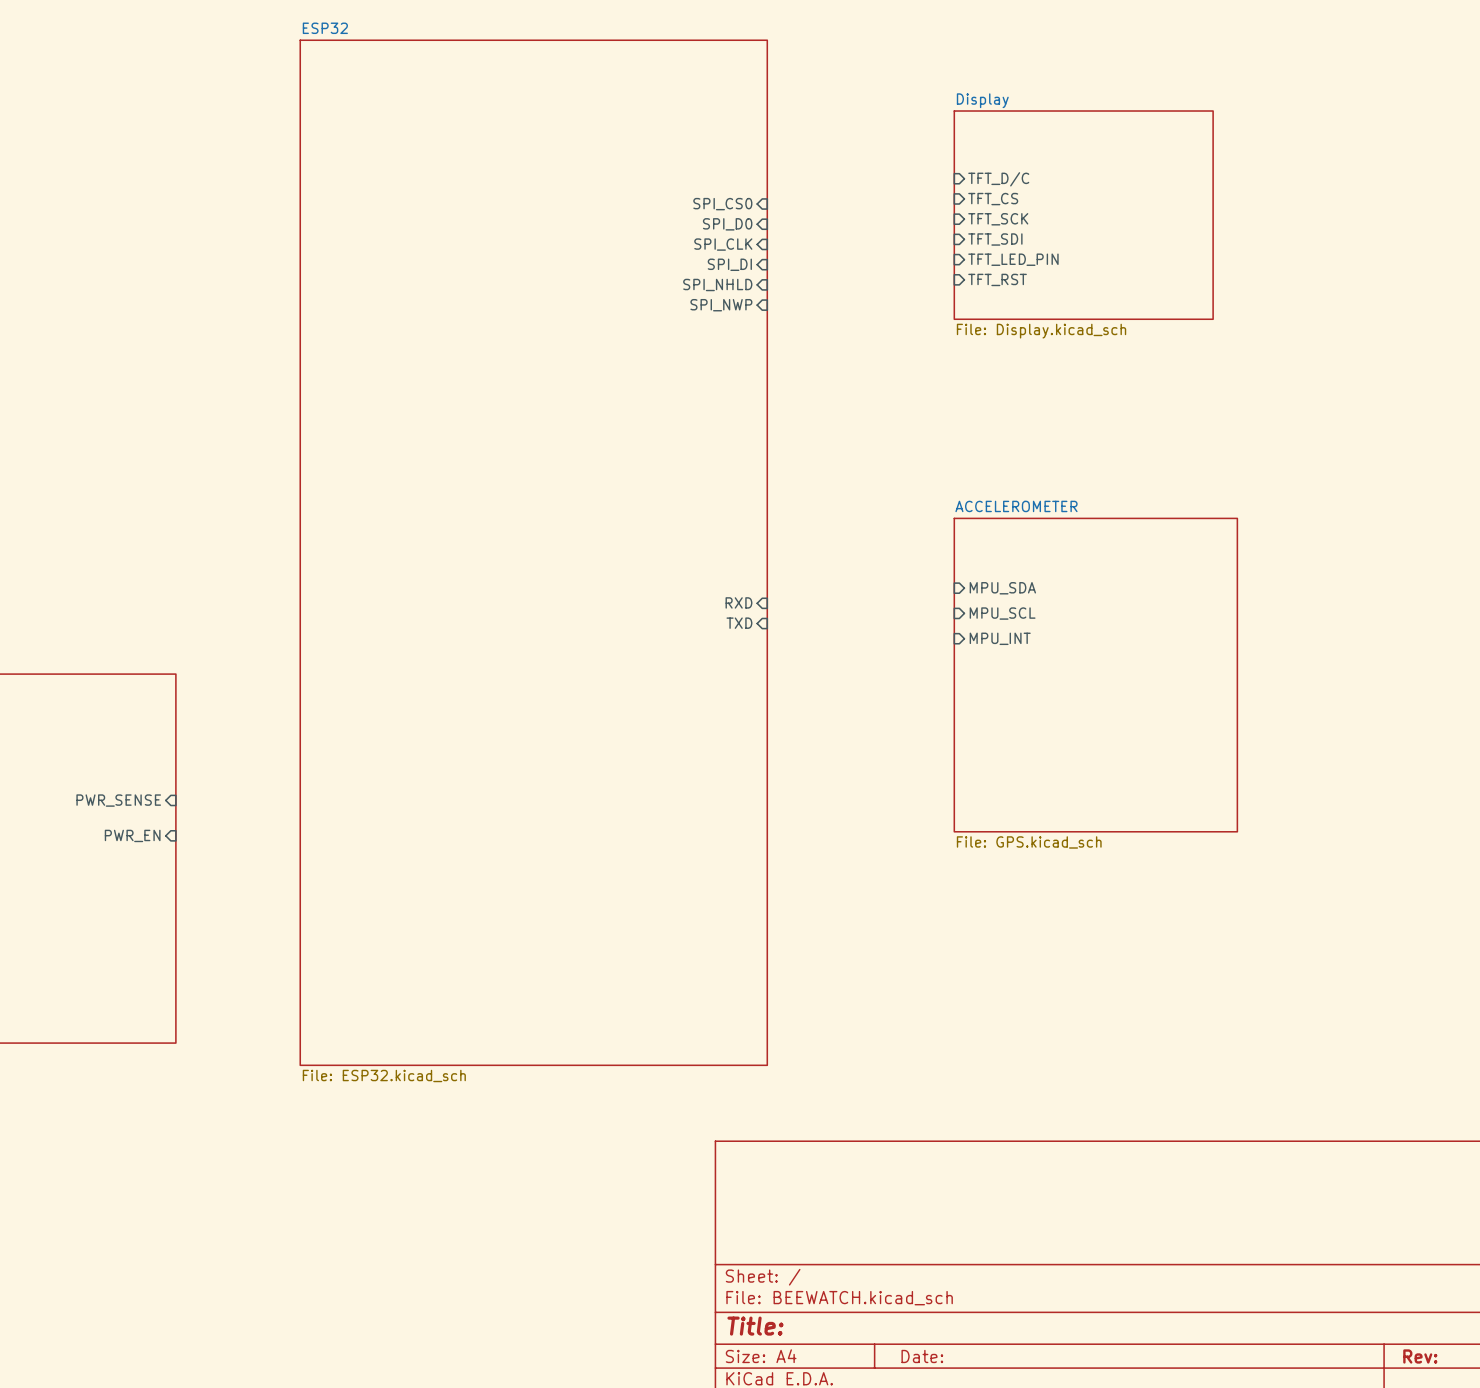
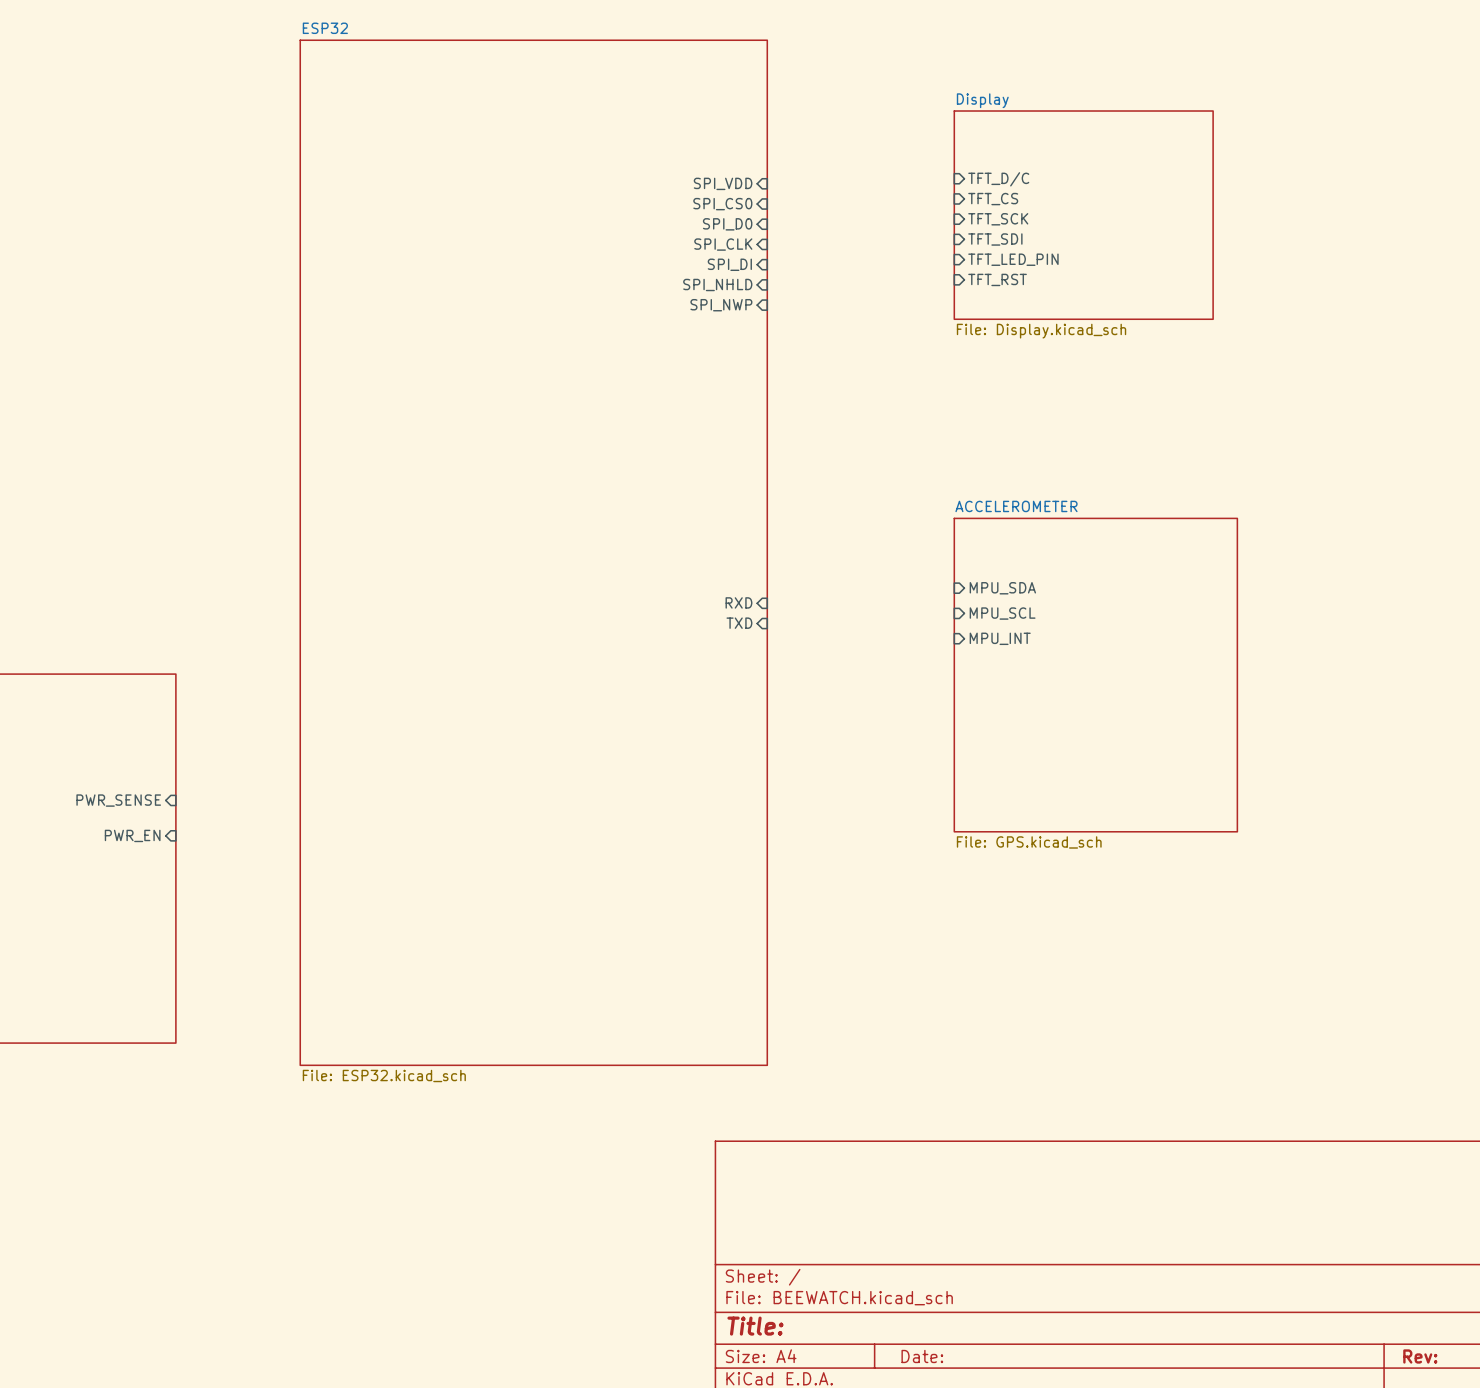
sheet pin: none -> SPI_VDD (723, 183)

